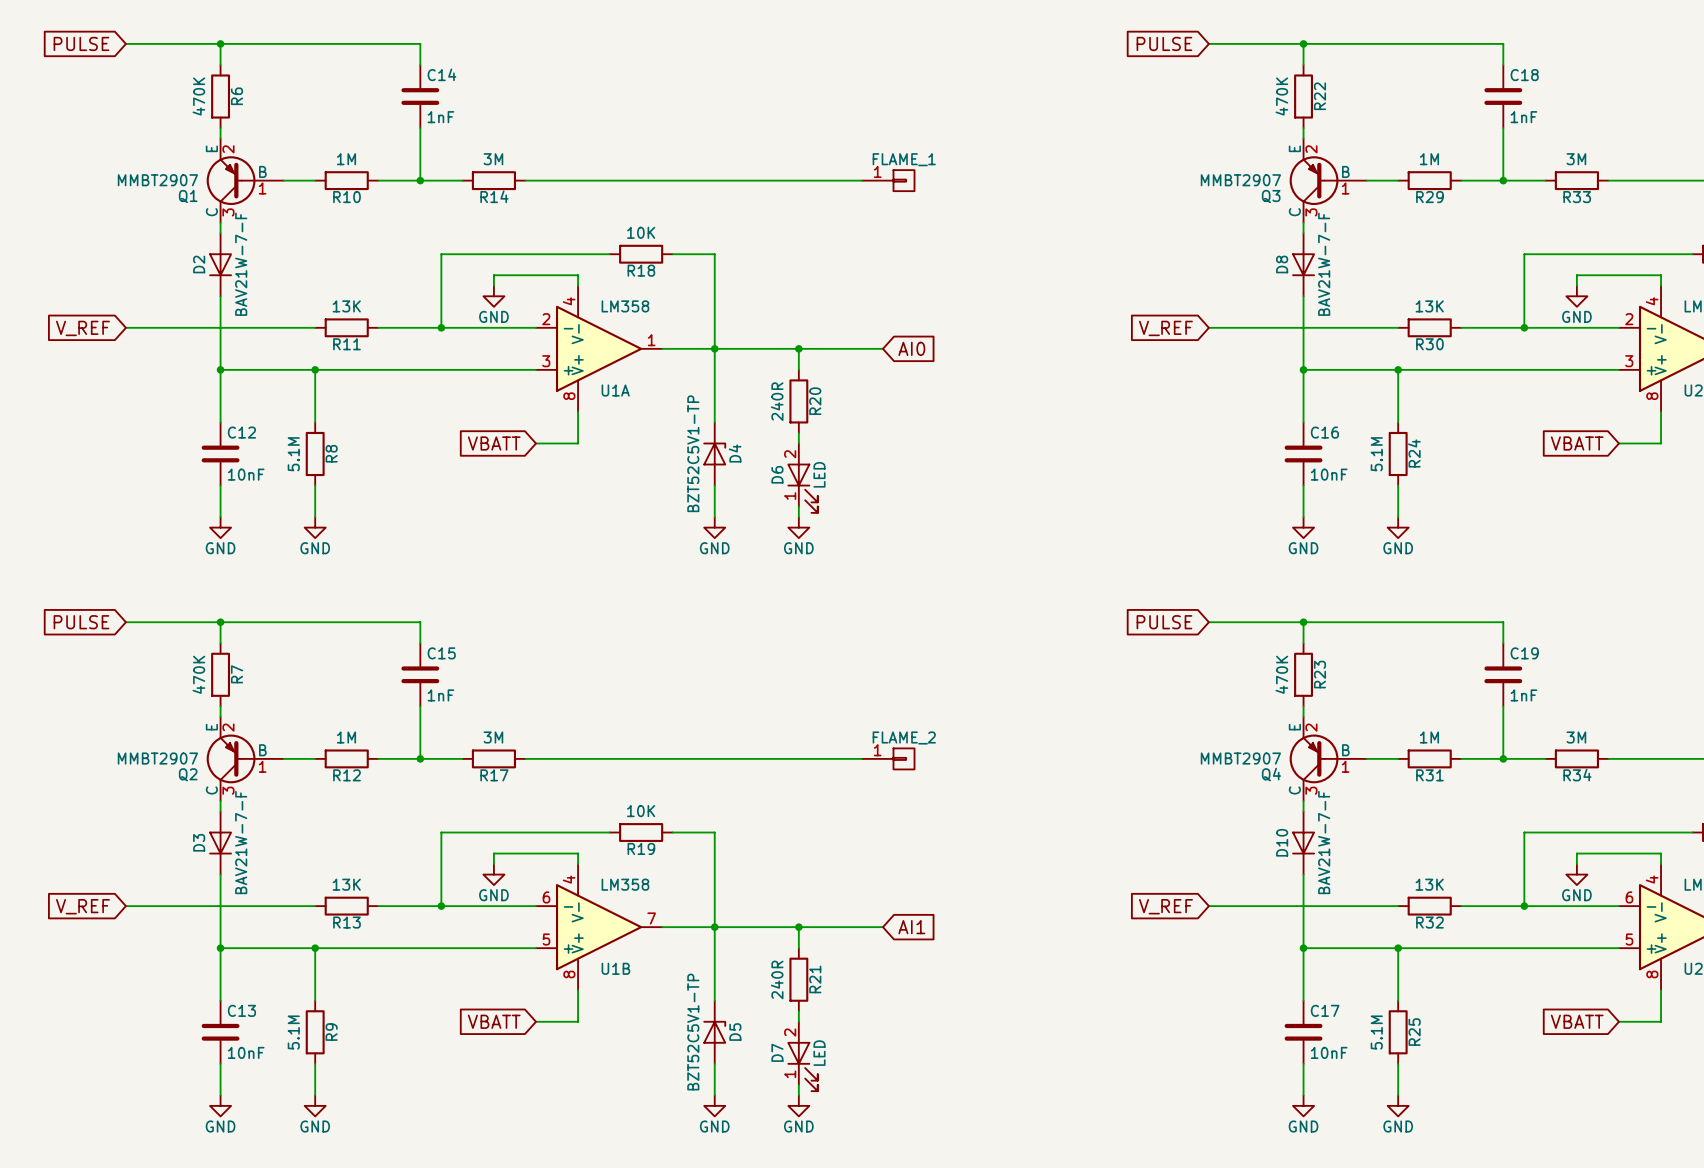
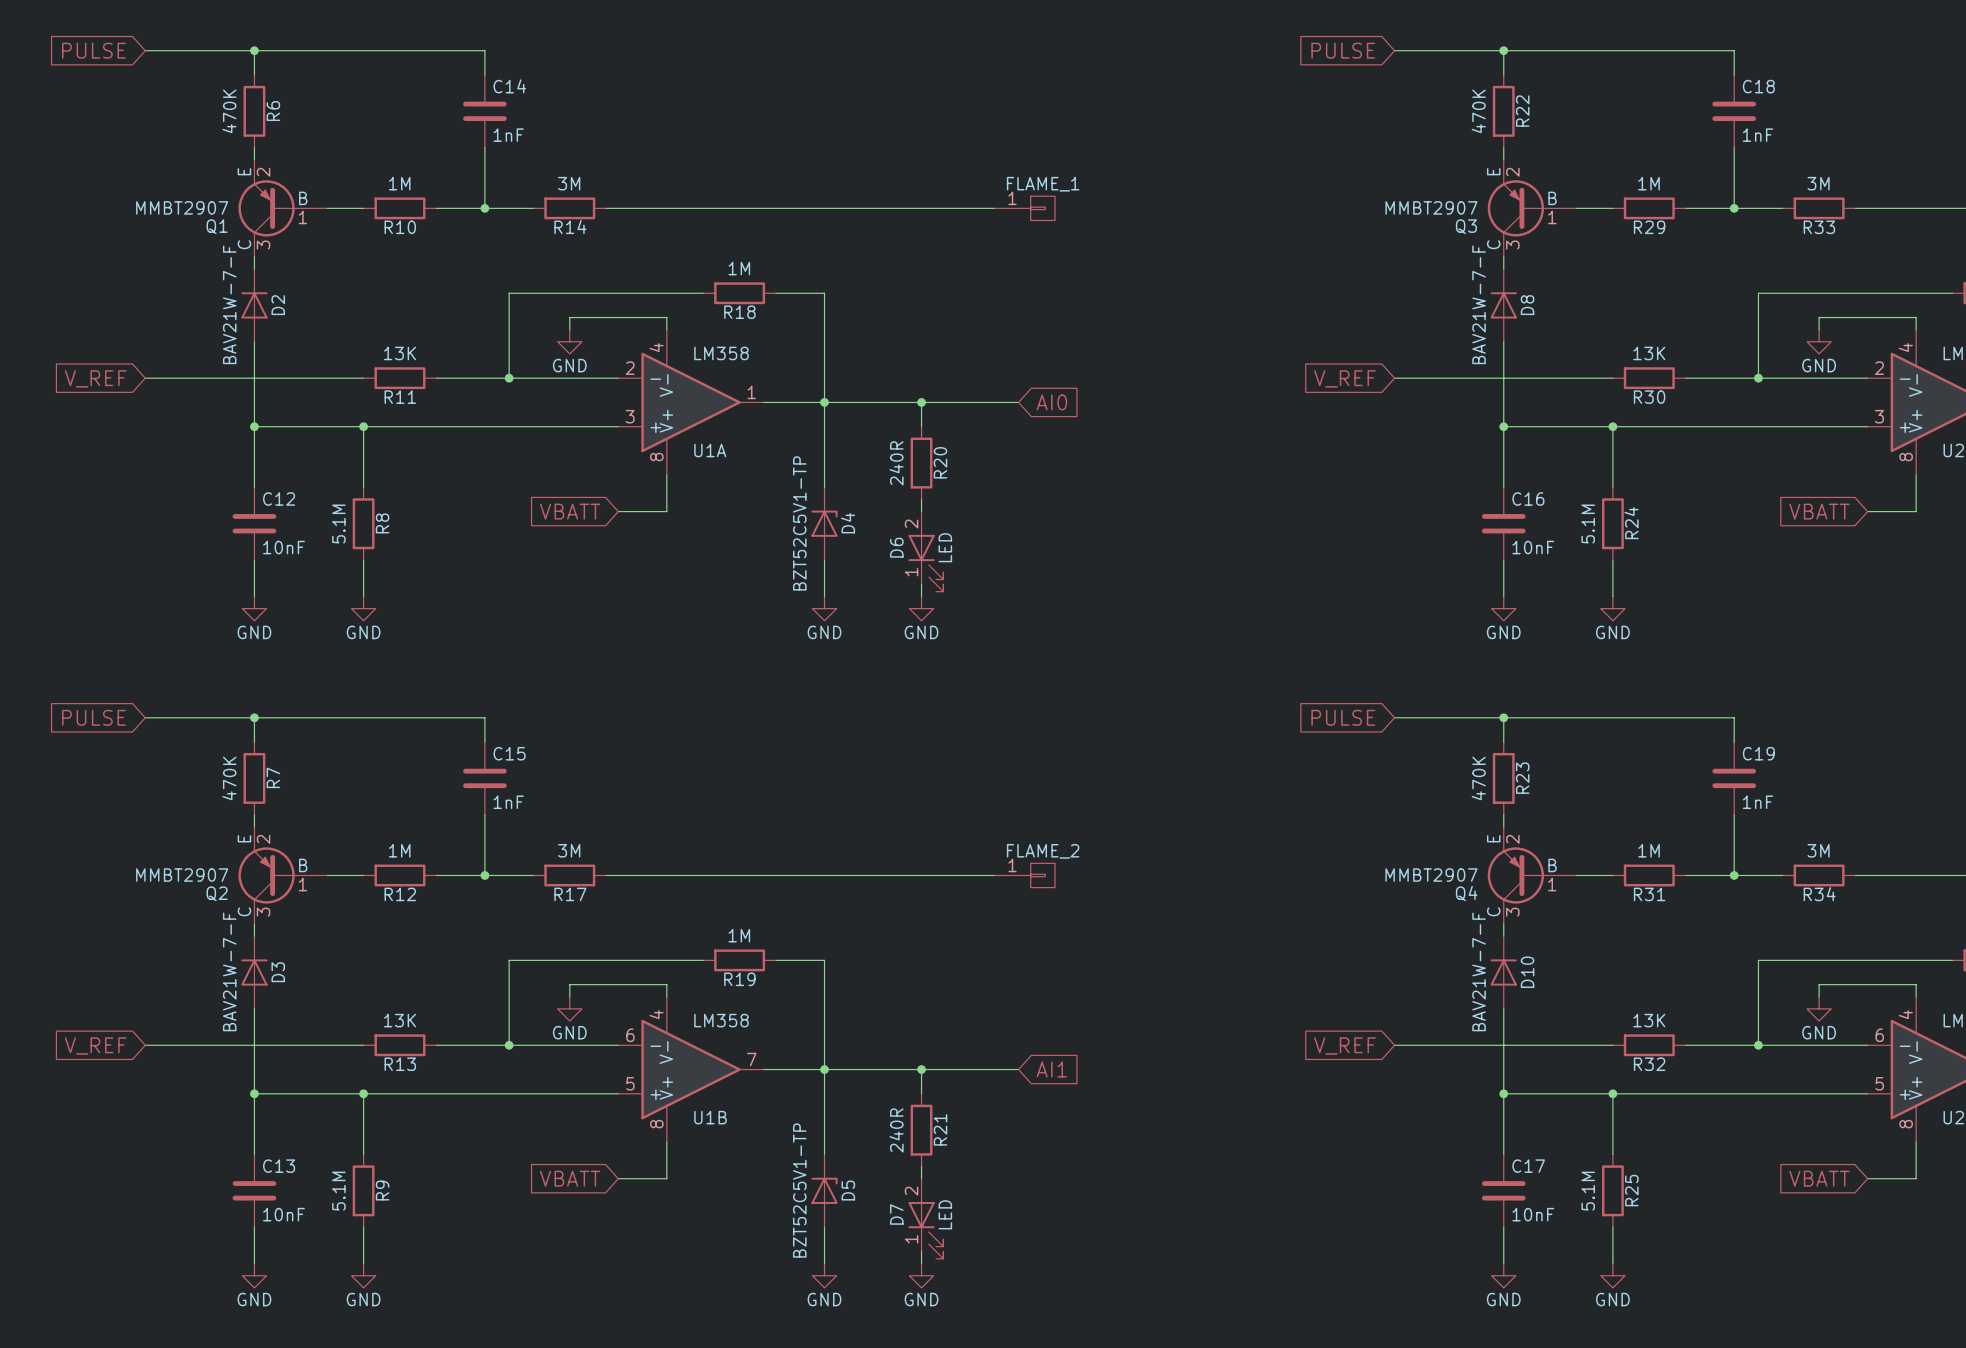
R18 value: 10K (641, 232) -> 1M (739, 268)
D2 rotation: 0° (220, 264) -> 180° (254, 305)
D8 rotation: 0° (1303, 264) -> 180° (1503, 305)
R19 value: 10K (641, 811) -> 1M (739, 935)
D3 rotation: 0° (220, 843) -> 180° (254, 972)
D10 rotation: 0° (1303, 843) -> 180° (1503, 972)

